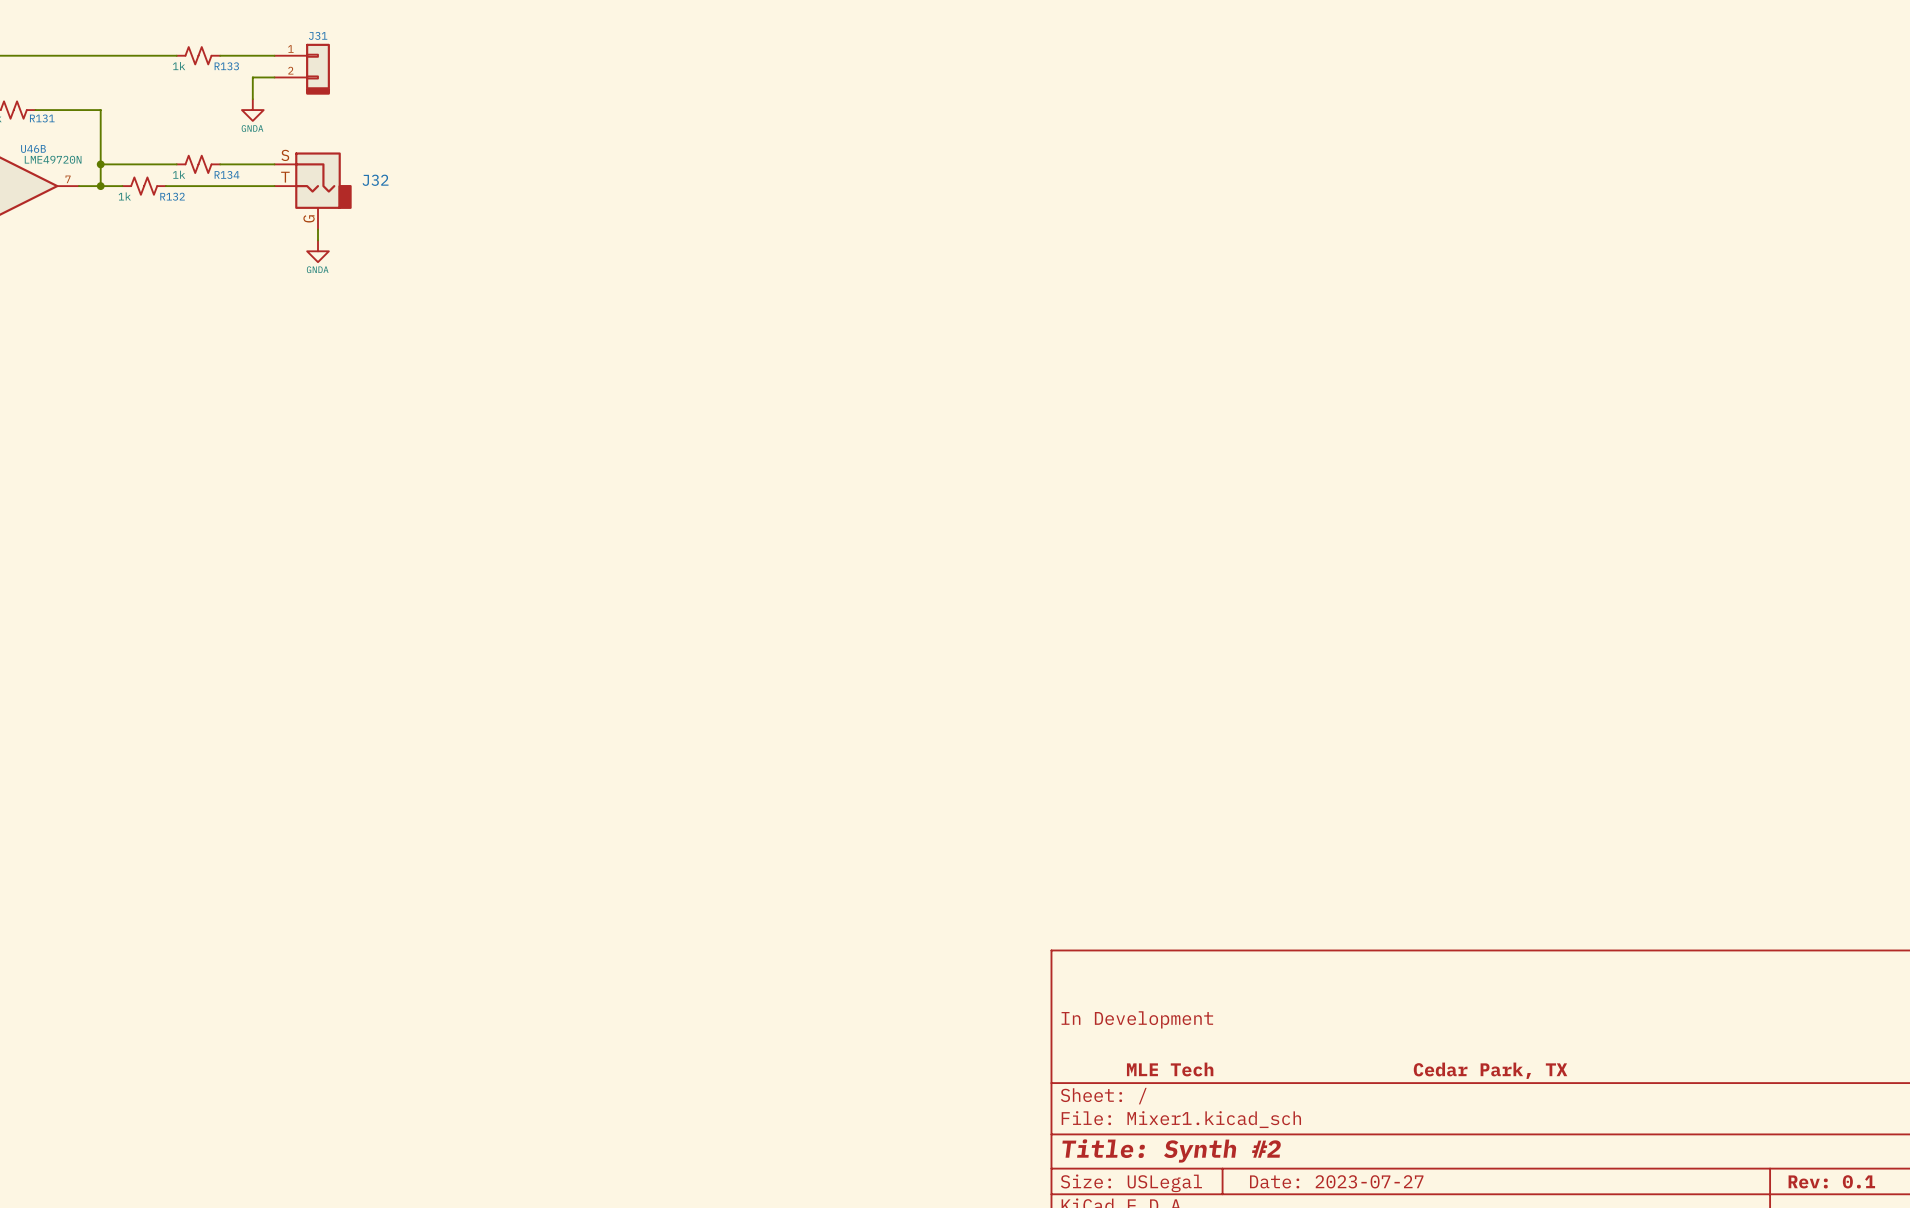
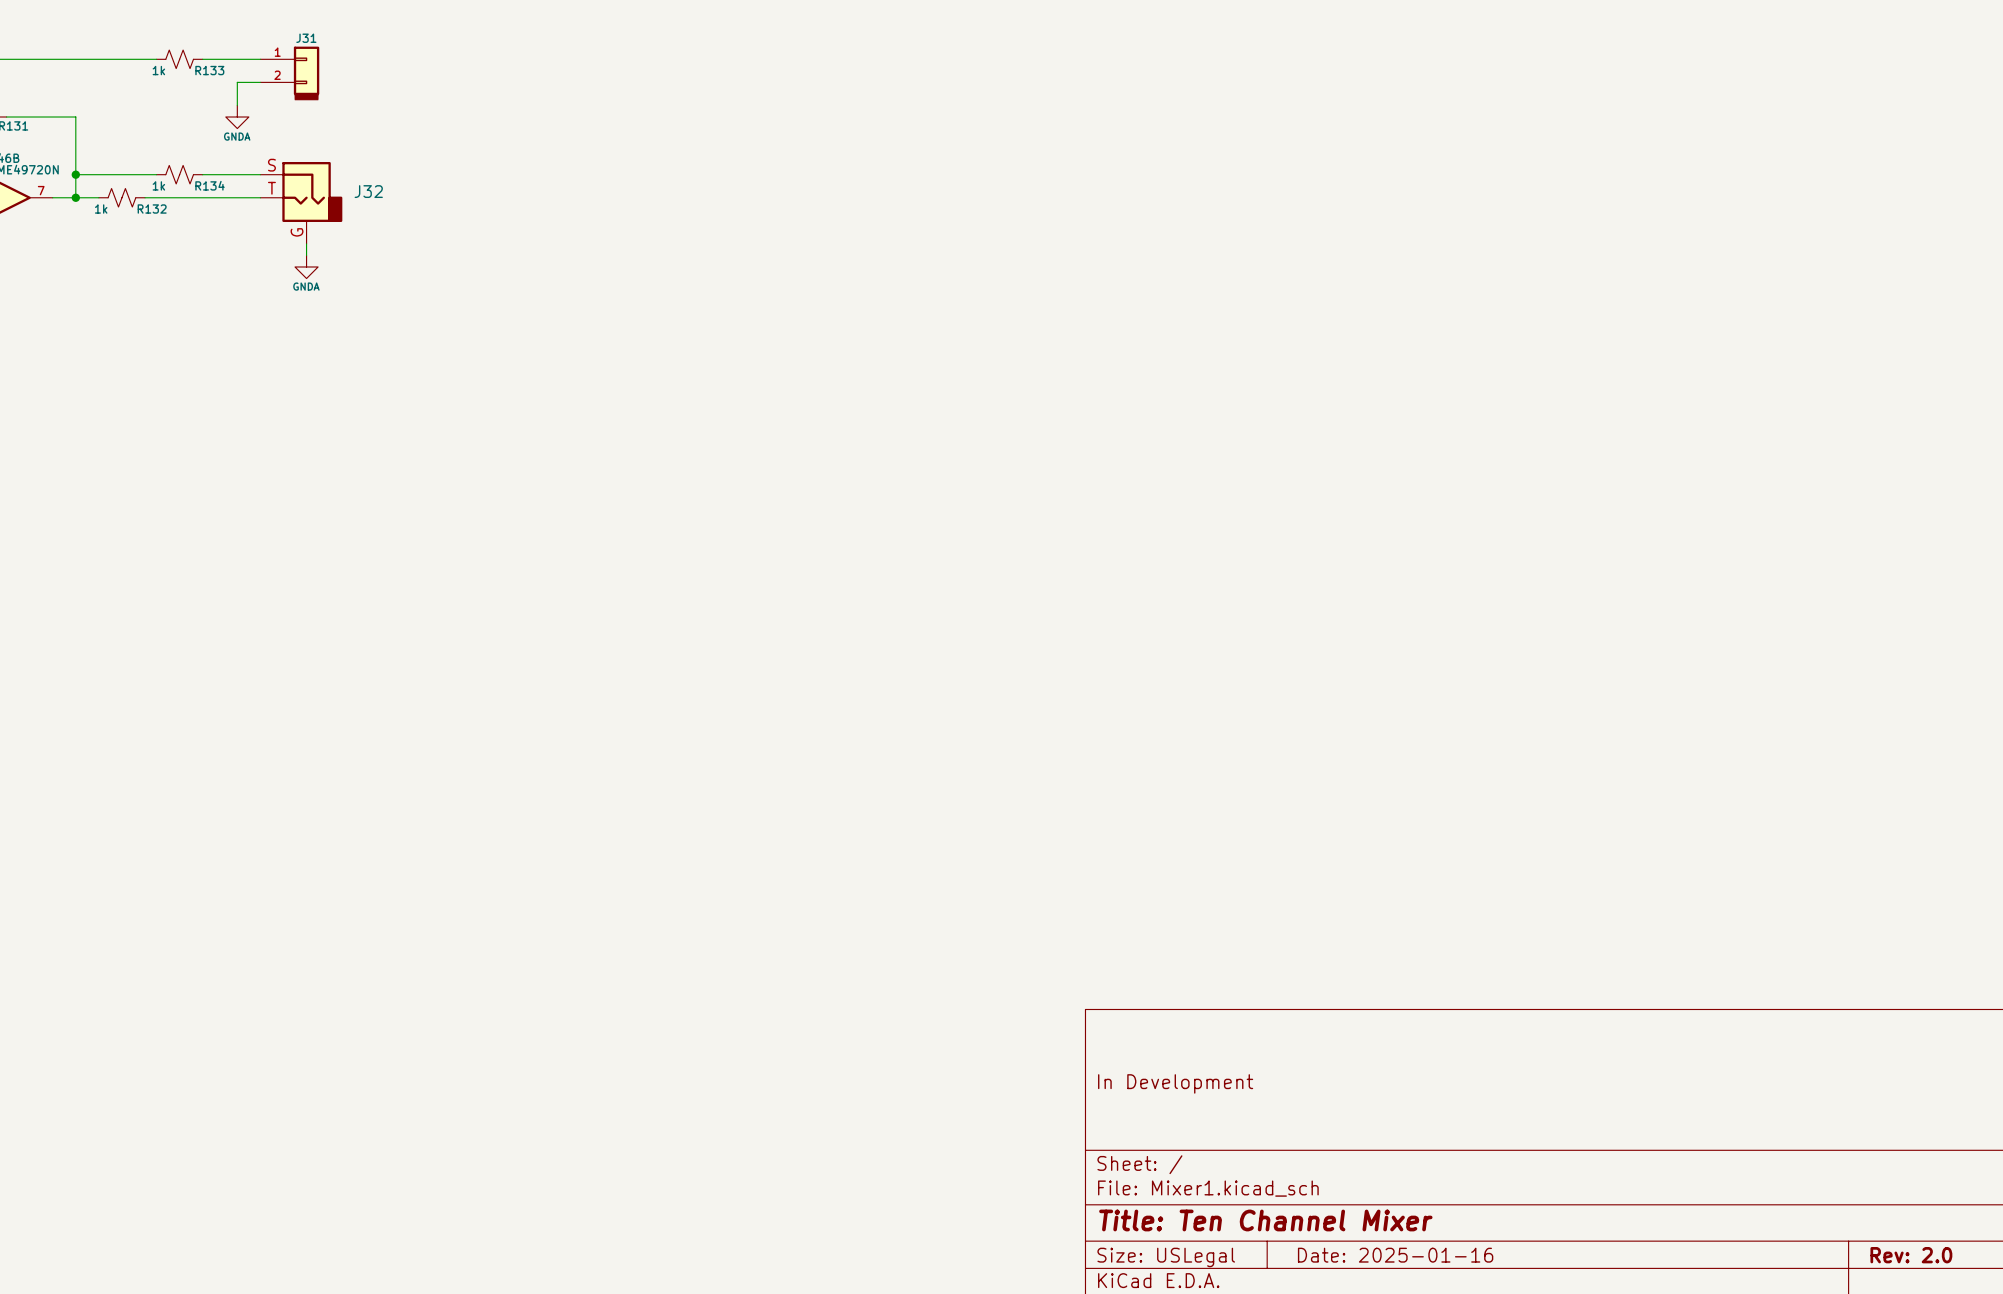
title block: MLE Tech Cedar Park, TX (1347, 1070) -> none
title block: Title: Synth #2 (1171, 1150) -> Title: Ten Channel Mixer (1265, 1220)
title block: Date: 2023-07-27 (1336, 1181) -> Date: 2025-01-16 (1395, 1255)
title block: Rev: 0.1 (1831, 1181) -> Rev: 2.0 (1911, 1255)

